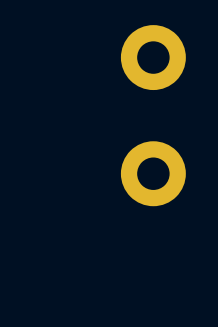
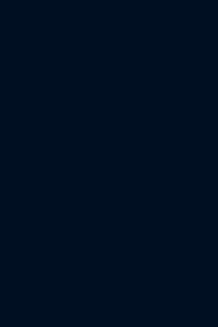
part: (153, 57) -> none
part: (153, 173) -> none

